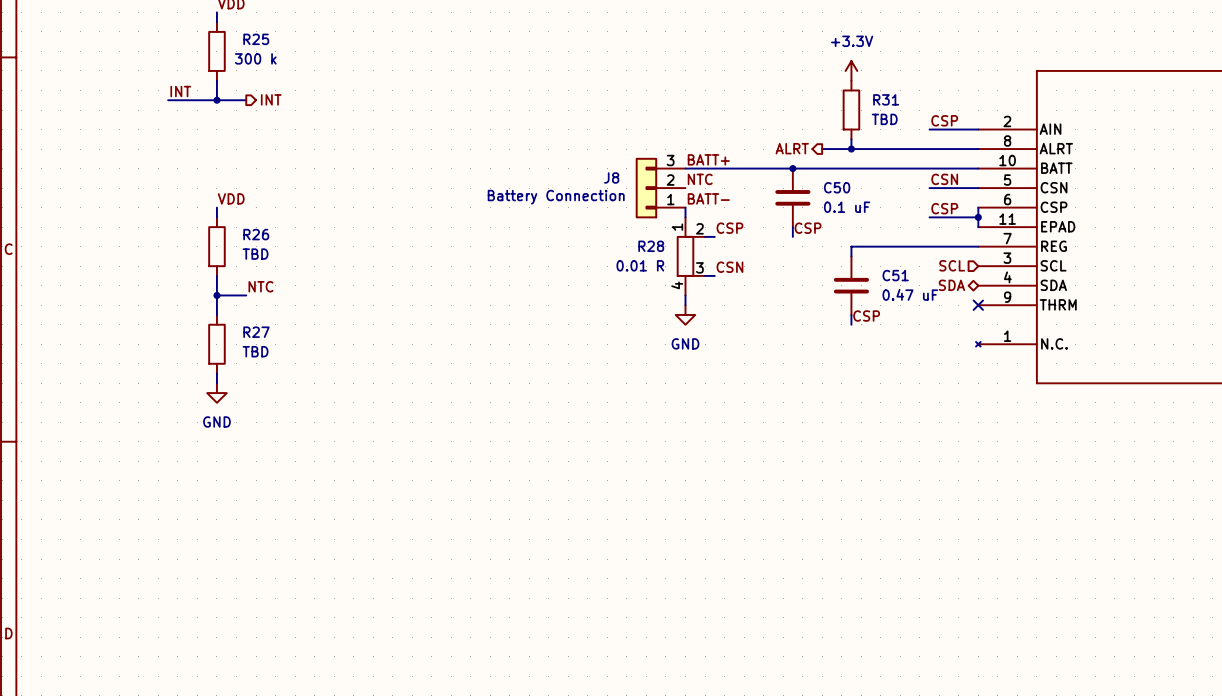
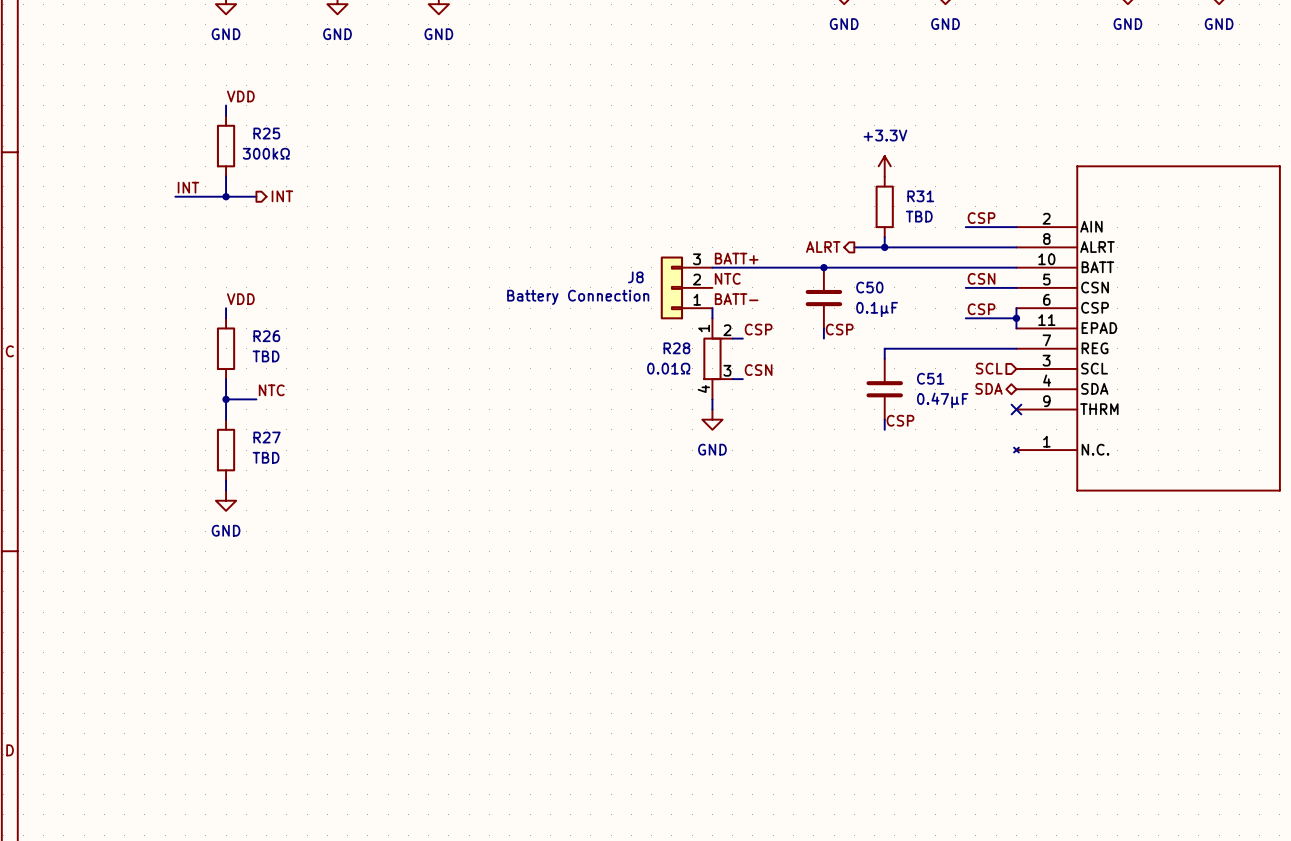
R25 value: 300 k (255, 58) -> 300kΩ (266, 153)
C50 value: 0.1 uF (847, 207) -> 0.1µF (877, 309)
R28 value: 0.01 R (640, 265) -> 0.01Ω (668, 368)
C51 value: 0.47 uF (910, 294) -> 0.47µF (942, 400)

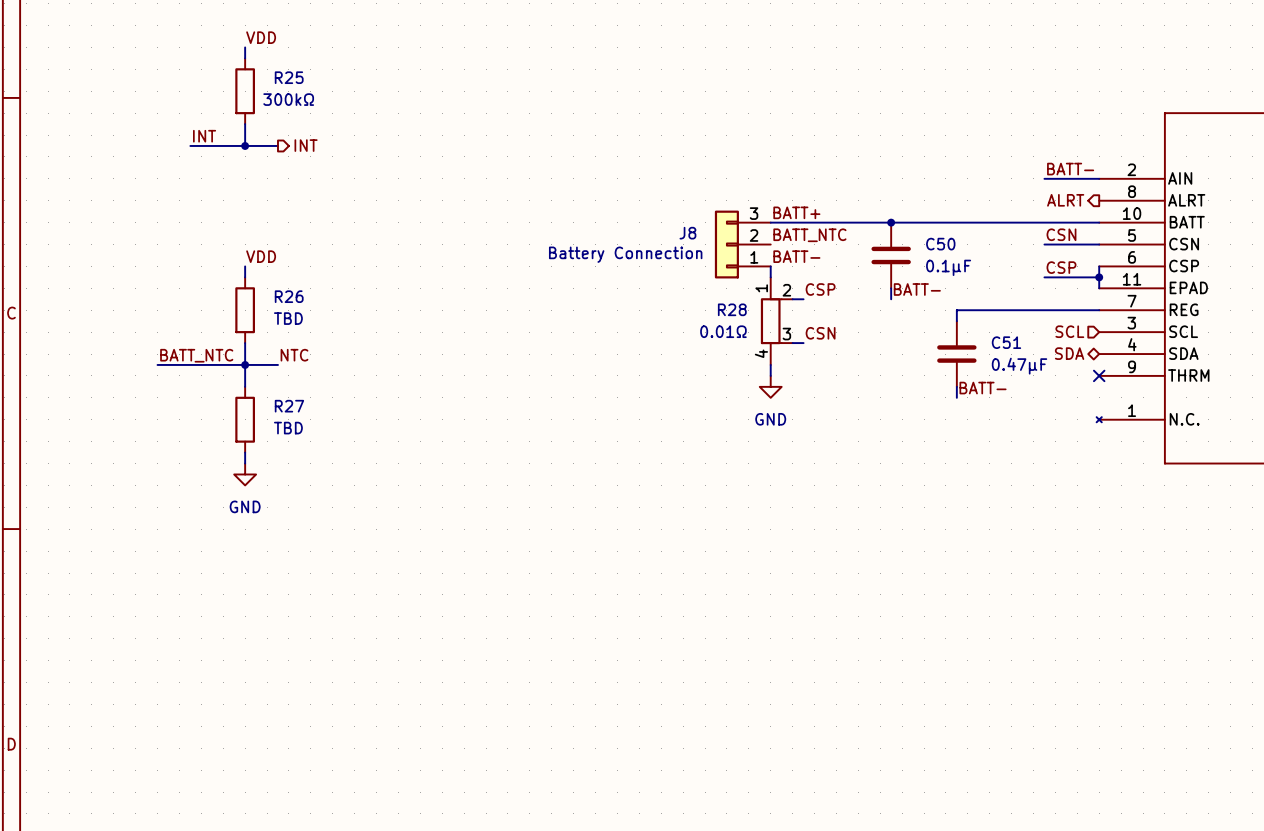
power symbol: +3.3V (884, 166) -> none
R31: TBD (884, 206) -> none
label: CSP (981, 218) -> BATT- (1070, 169)
wire: (884, 237) (884, 247) -> none
hierarchical label position: ALRT (823, 247) -> ALRT (1065, 200)
wire: (854, 247) (1016, 247) -> none
junction: (884, 247) -> none
label: NTC (727, 278) -> BATT_NTC (809, 235)
label: CSP (839, 329) -> BATT- (917, 289)
label: none -> BATT_NTC (196, 355)
wire: none -> (157, 364) (245, 364)
label: CSP (900, 420) -> BATT- (983, 388)

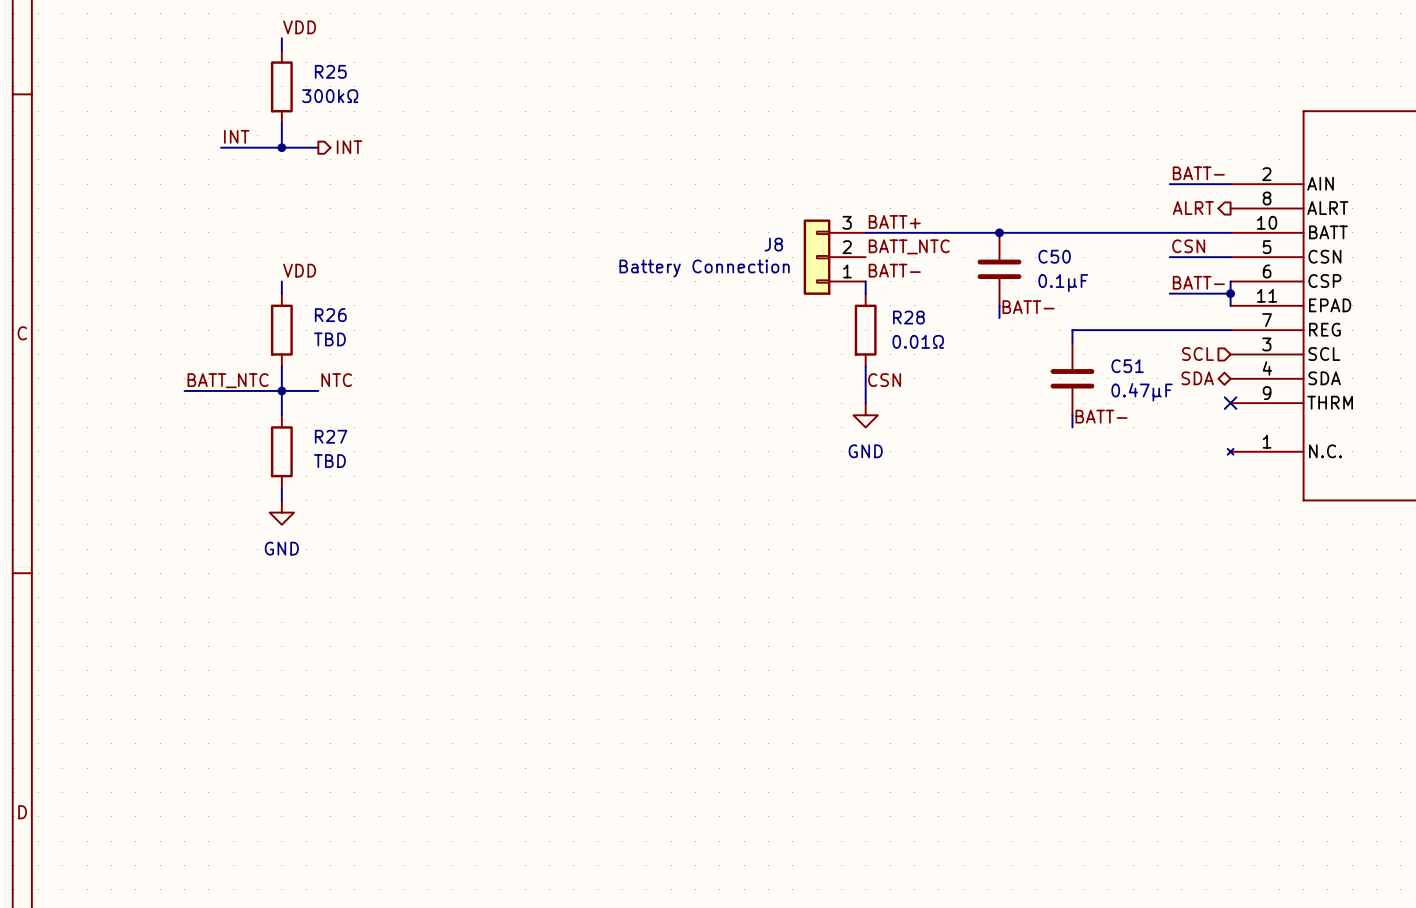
label: CSP (1061, 267) -> BATT- (1198, 282)
R28 symbol: [760, 277, 793, 365] -> [854, 293, 877, 367]
label: CSP (820, 289) -> none
wire: (792, 299) (803, 299) -> none
R28 name position: R28 (732, 309) -> R28 (908, 317)
R28 value position: 0.01Ω (723, 331) -> 0.01Ω (918, 341)
label position: CSN (820, 333) -> CSN (884, 380)
wire: (792, 343) (803, 343) -> none

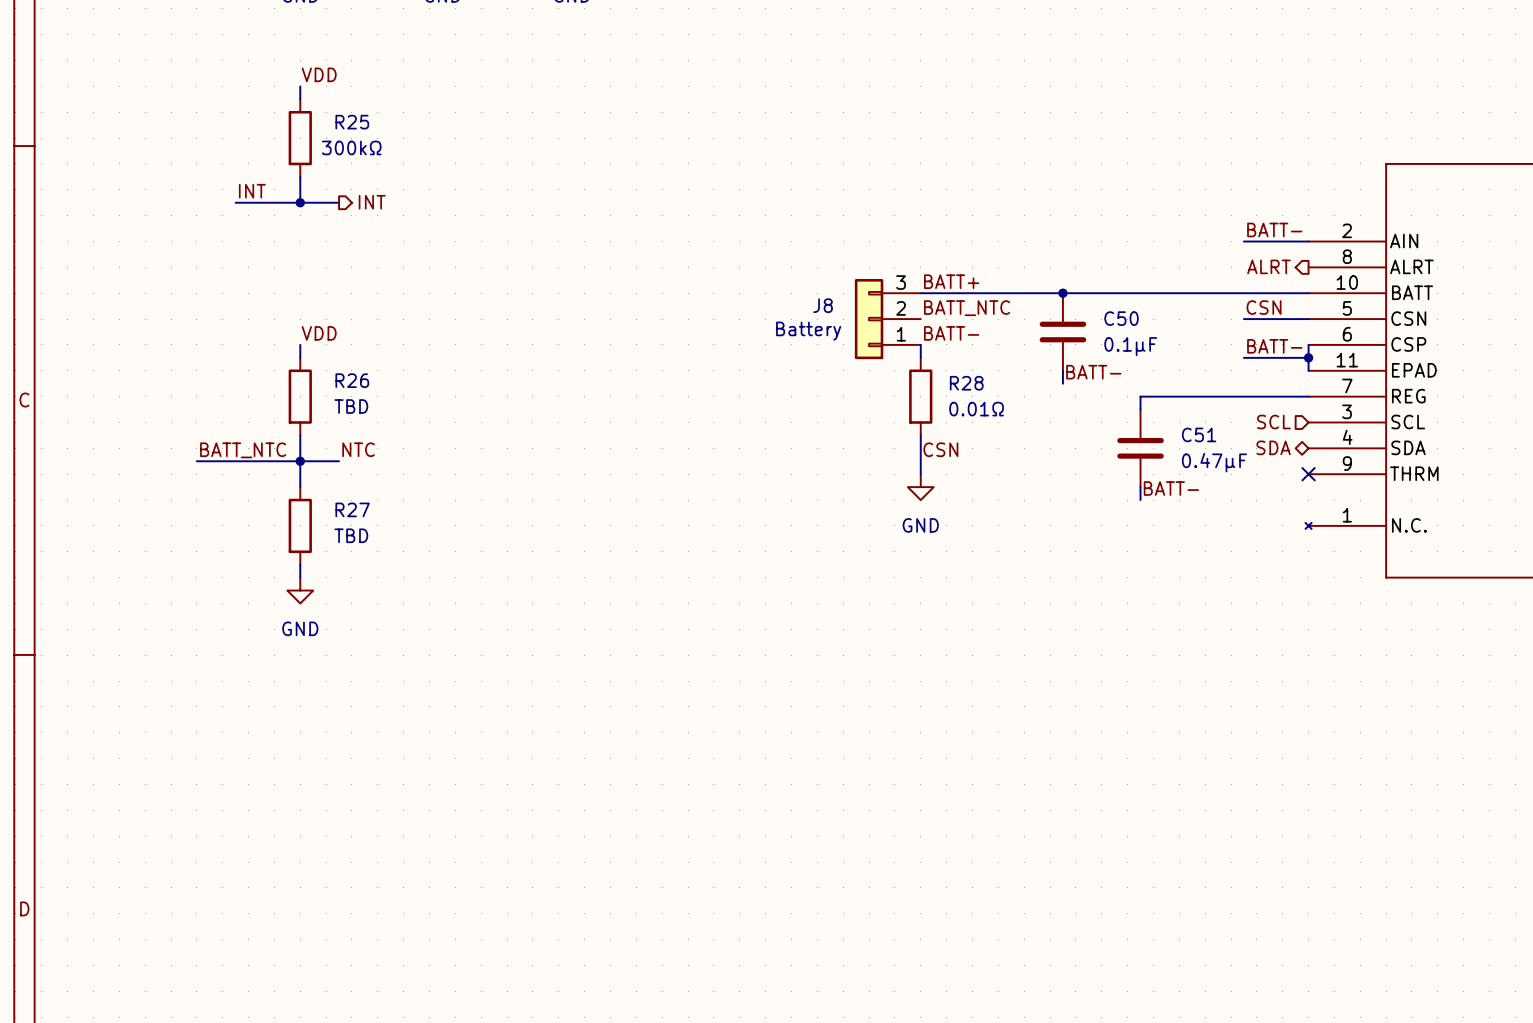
J8 value: Battery Connection (704, 268) -> Battery (808, 331)

